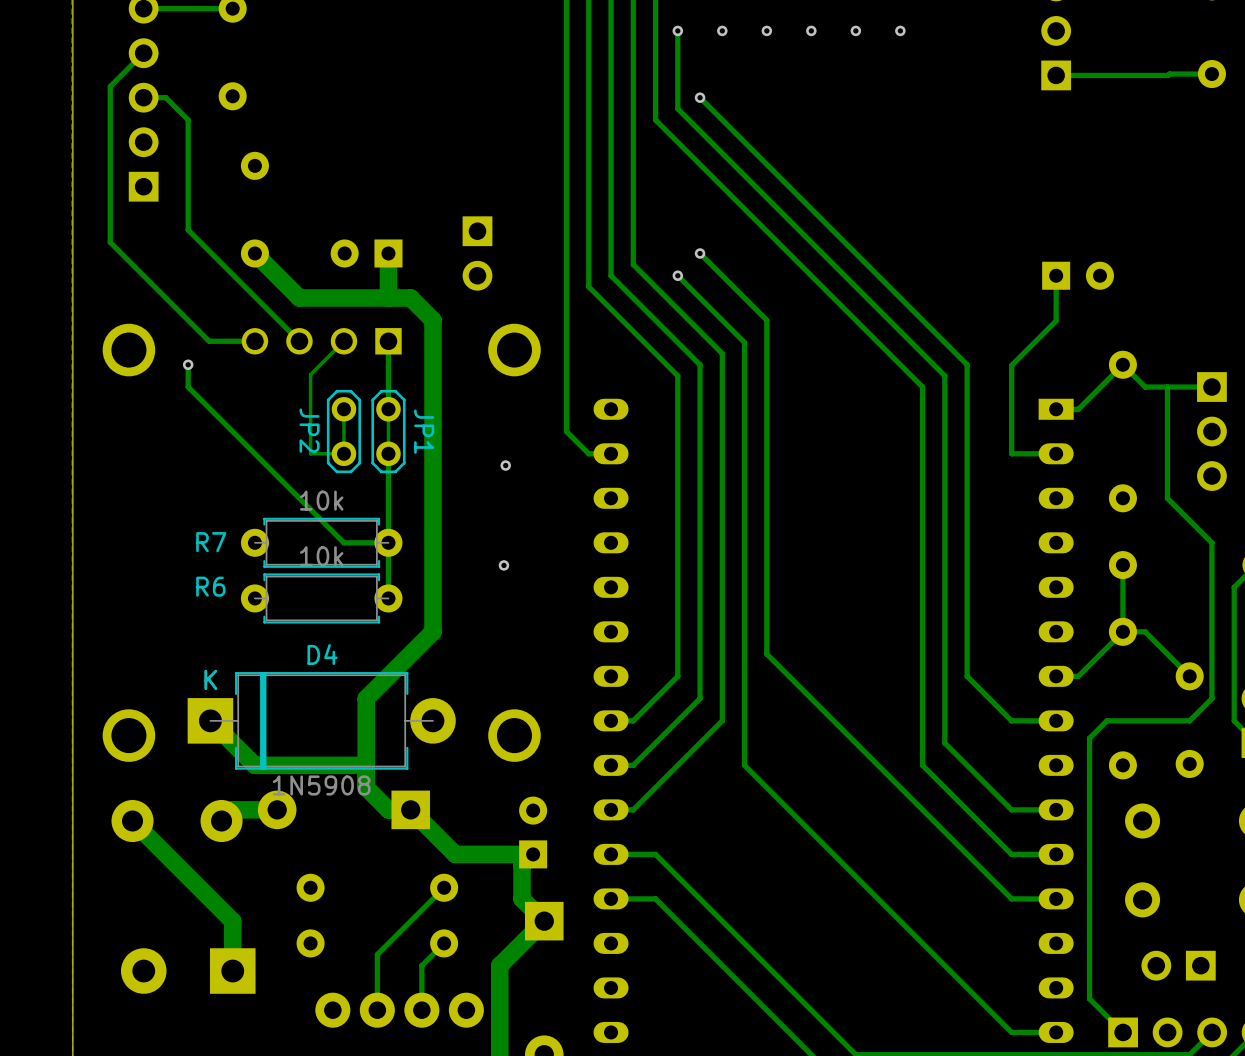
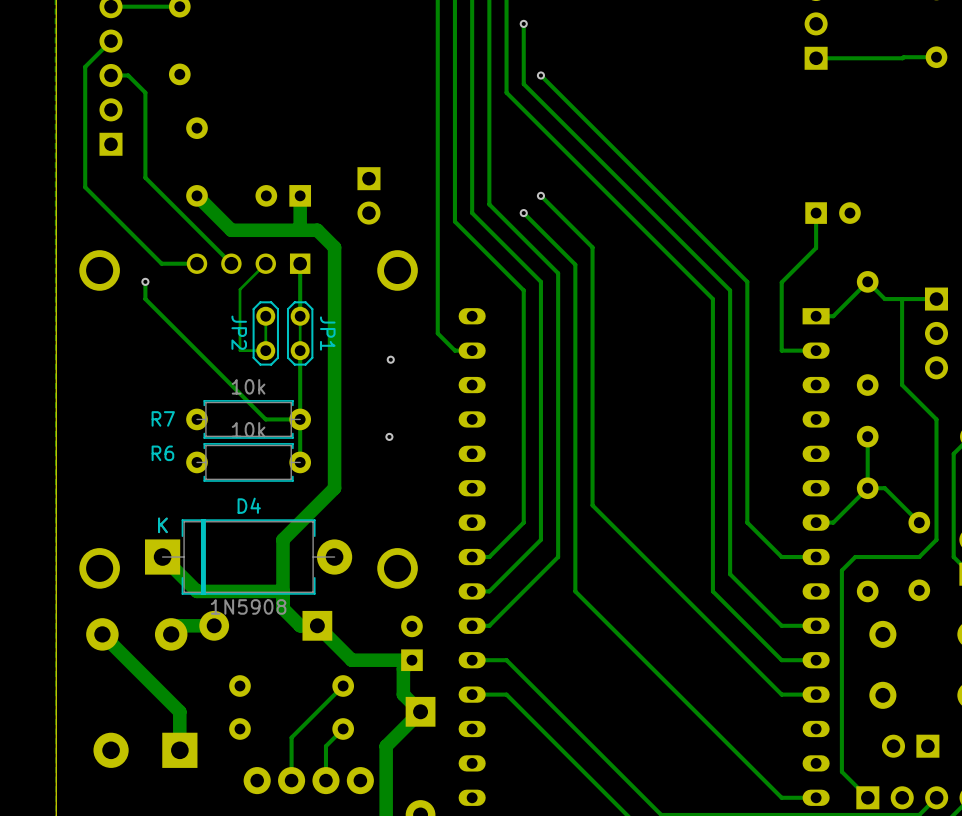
via: (722, 30) -> none
via: (766, 30) -> none
via: (811, 30) -> none
via: (855, 30) -> none
via: (900, 30) -> none

